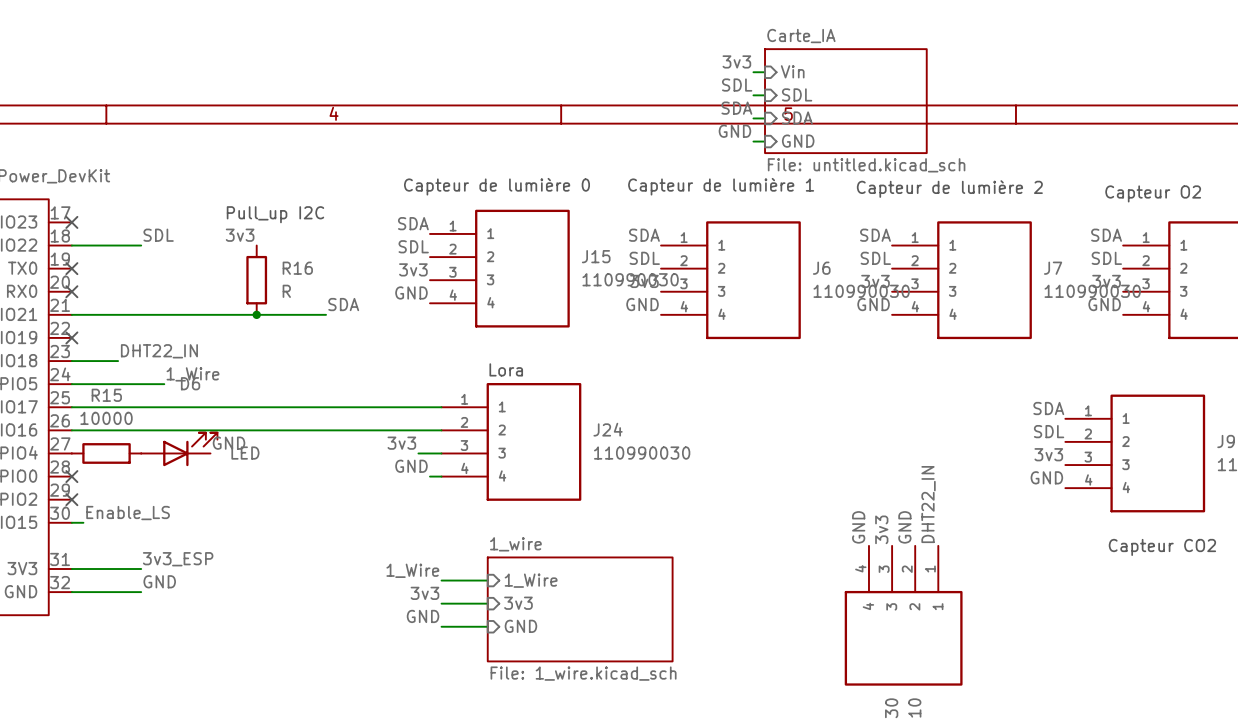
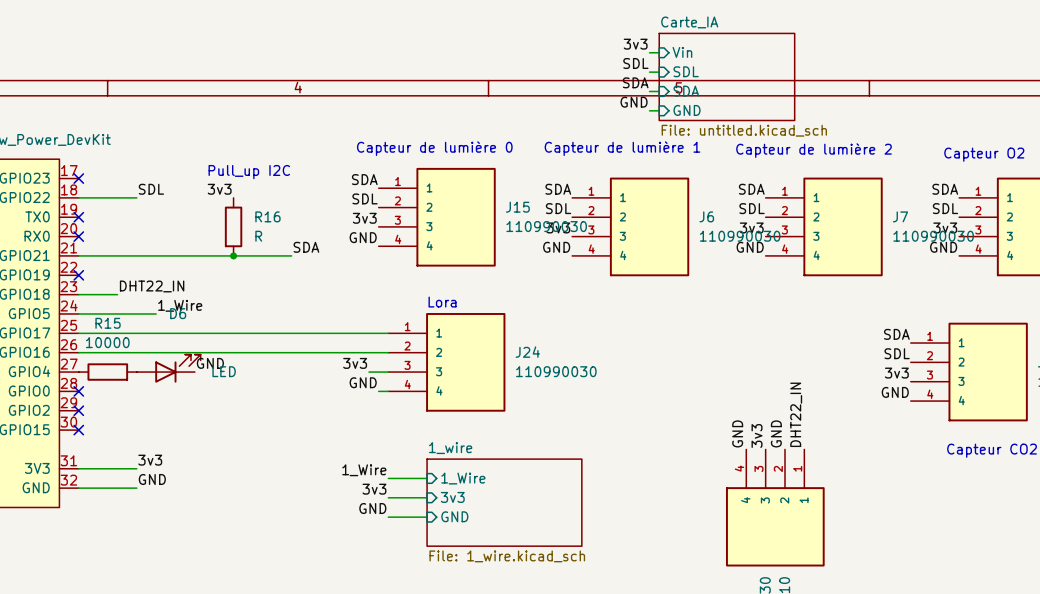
label: Enable_LS (128, 513) -> none
wire: (71, 522) (83, 522) -> none
no-connect mark: none -> (78, 430)
label: 3v3_ESP (178, 559) -> 3v3 (150, 460)

